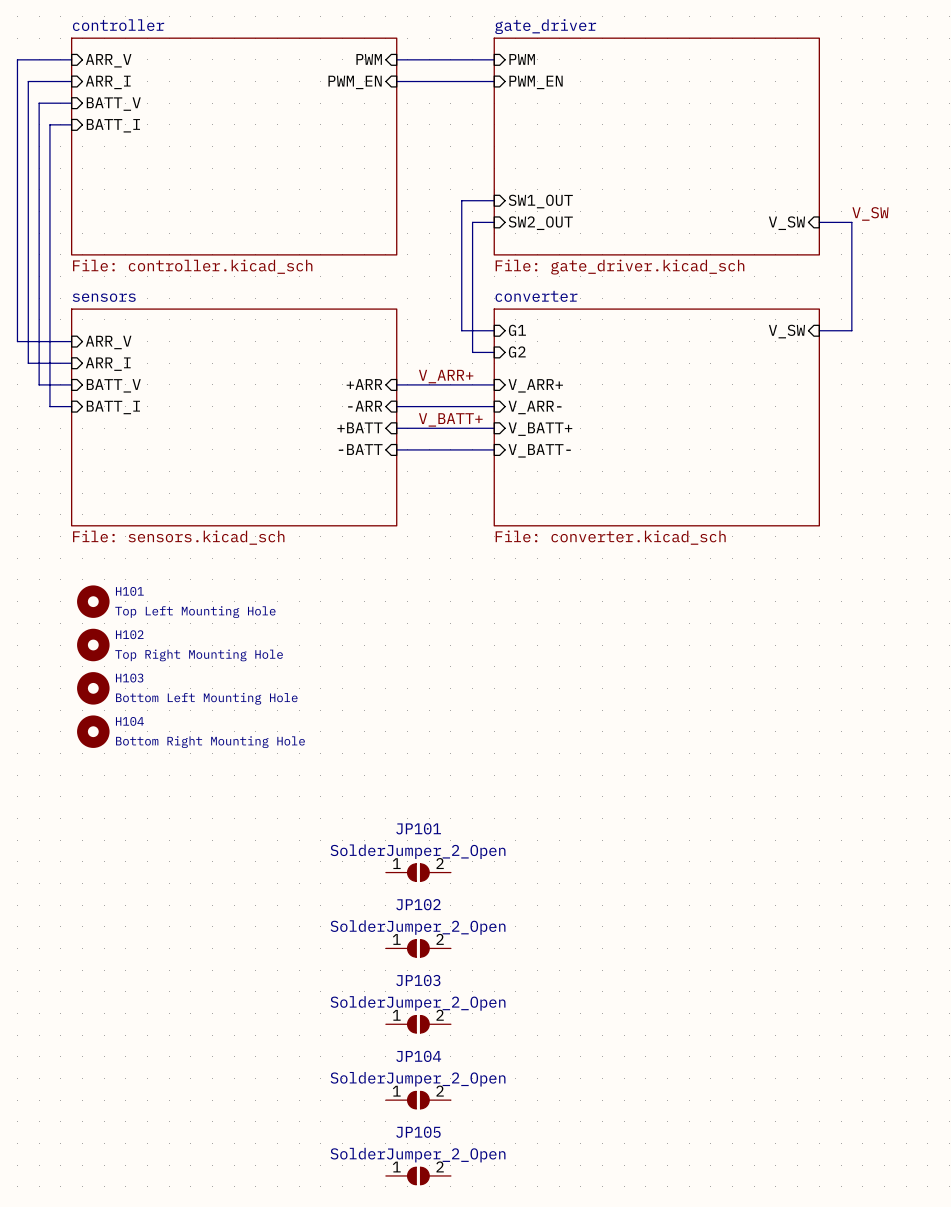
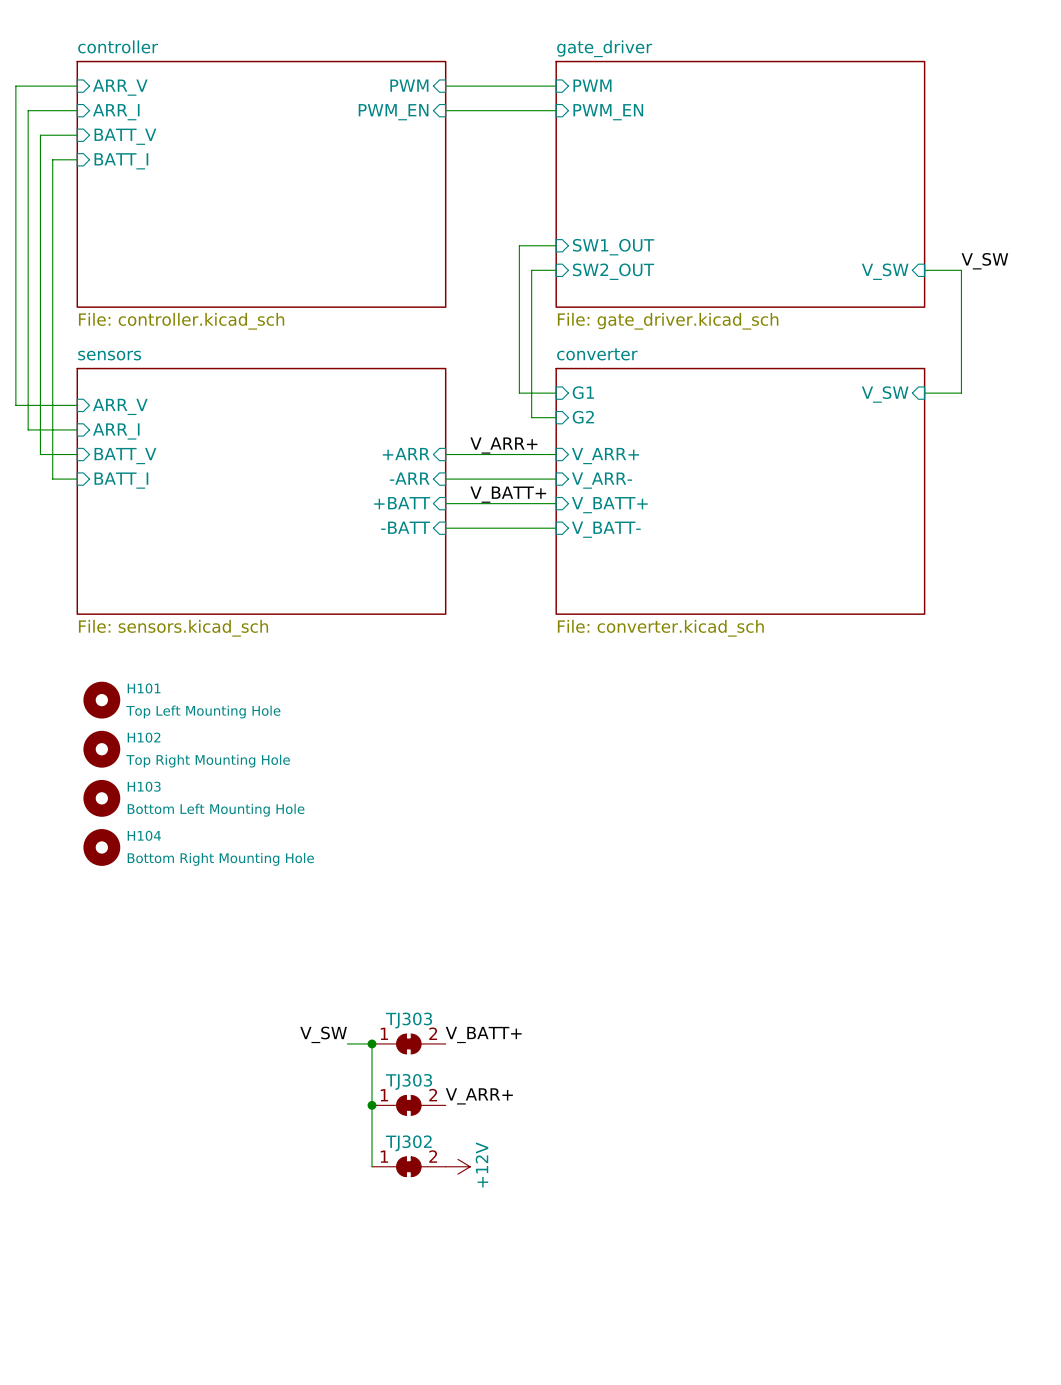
JP101: SolderJumper_2_Open (418, 872) -> none
label: none -> V_SW (323, 1034)
label: none -> V_BATT+ (483, 1034)
wire: none -> (347, 1043) (372, 1043) (372, 1166)
junction: none -> (372, 1043)
TJ303: none -> (408, 1043)
JP102: SolderJumper_2_Open (418, 948) -> none
label: none -> V_ARR+ (479, 1096)
junction: none -> (372, 1105)
TJ303: none -> (408, 1105)
TJ302: none -> (408, 1166)
power symbol: none -> +12V (457, 1166)
JP103: SolderJumper_2_Open (418, 1024) -> none
JP104: SolderJumper_2_Open (418, 1100) -> none
JP105: SolderJumper_2_Open (418, 1175) -> none

